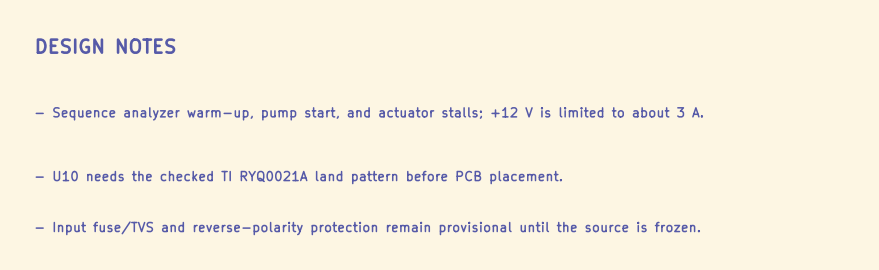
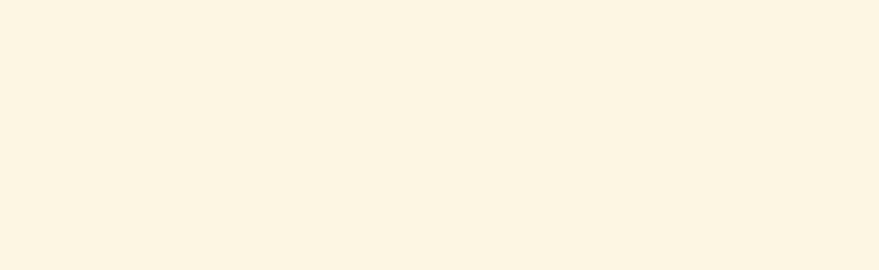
text: DESIGN NOTES (105, 46) -> none
text: - Sequence analyzer warm-up, pump start, and actuator stalls; +12 V is limited to about 3 A. (369, 113) -> none
text: - U10 needs the checked TI RYQ0021A land pattern before PCB placement. (298, 177) -> none
text: - Input fuse/TVS and reverse-polarity protection remain provisional until the source is frozen. (367, 228) -> none

